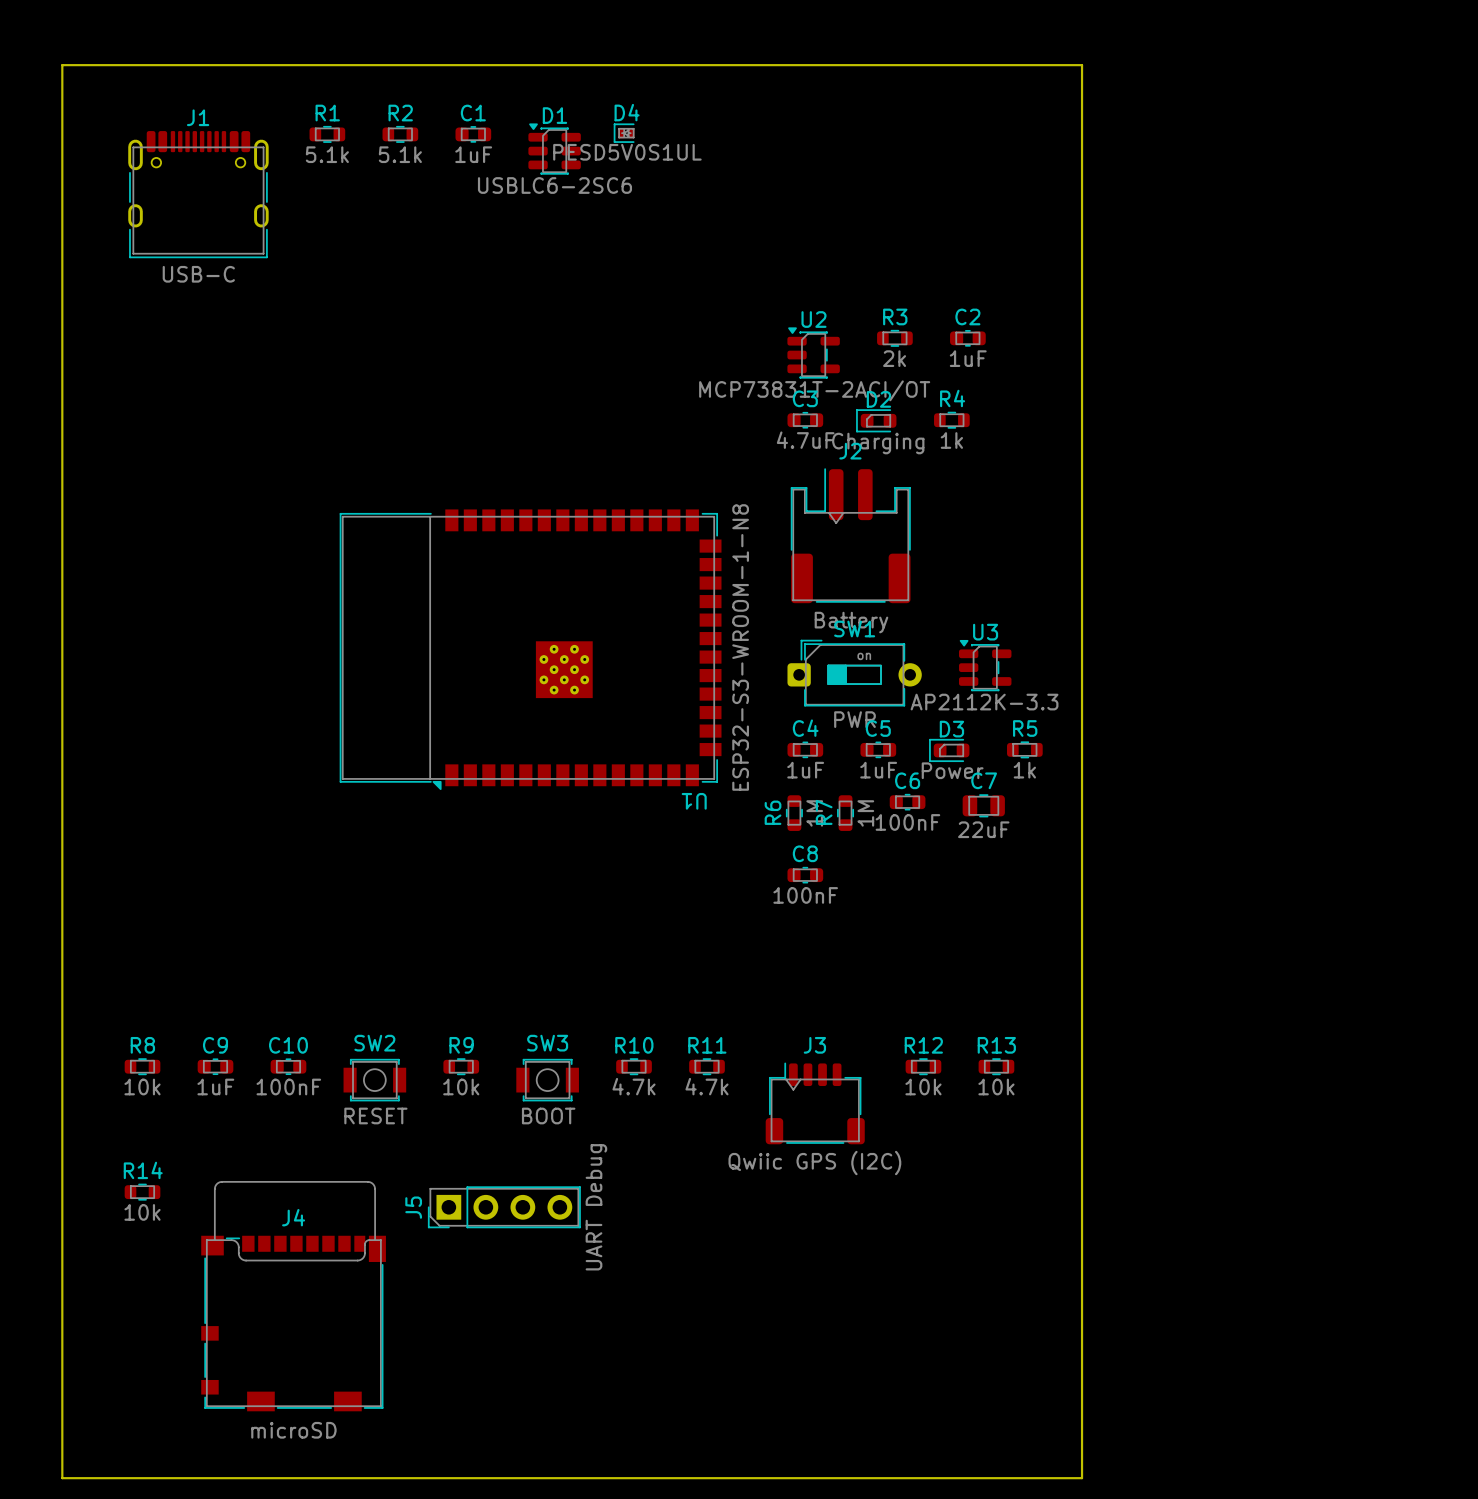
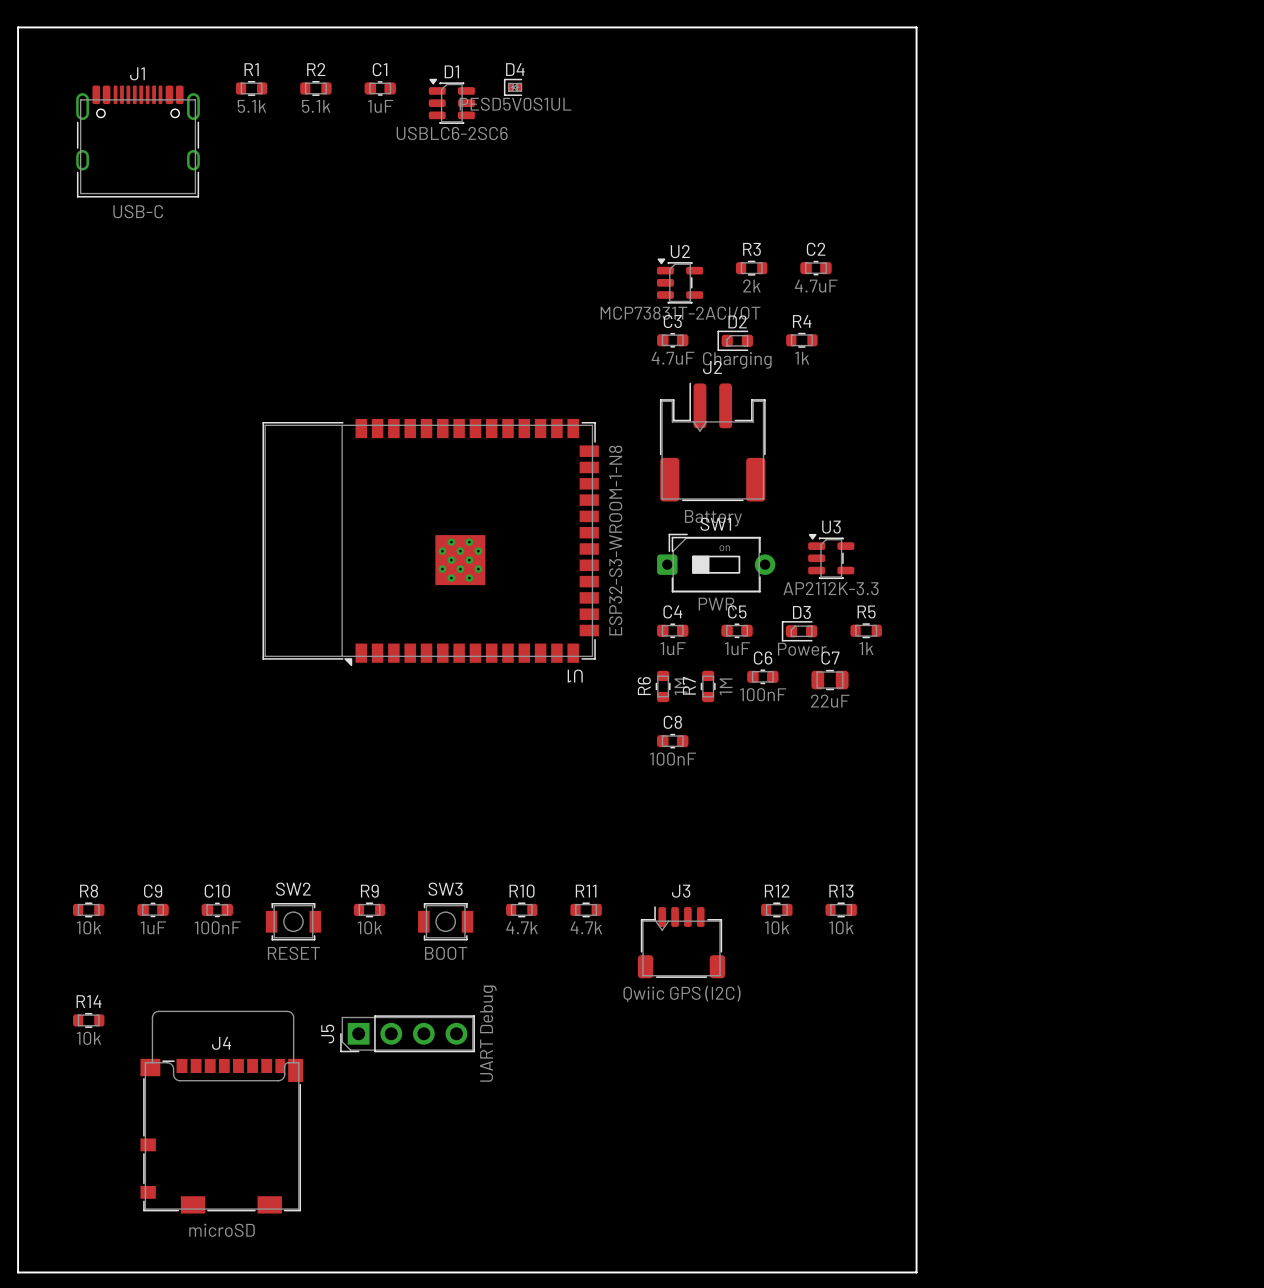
C2 value: 1uF (968, 358) -> 4.7uF (816, 286)

